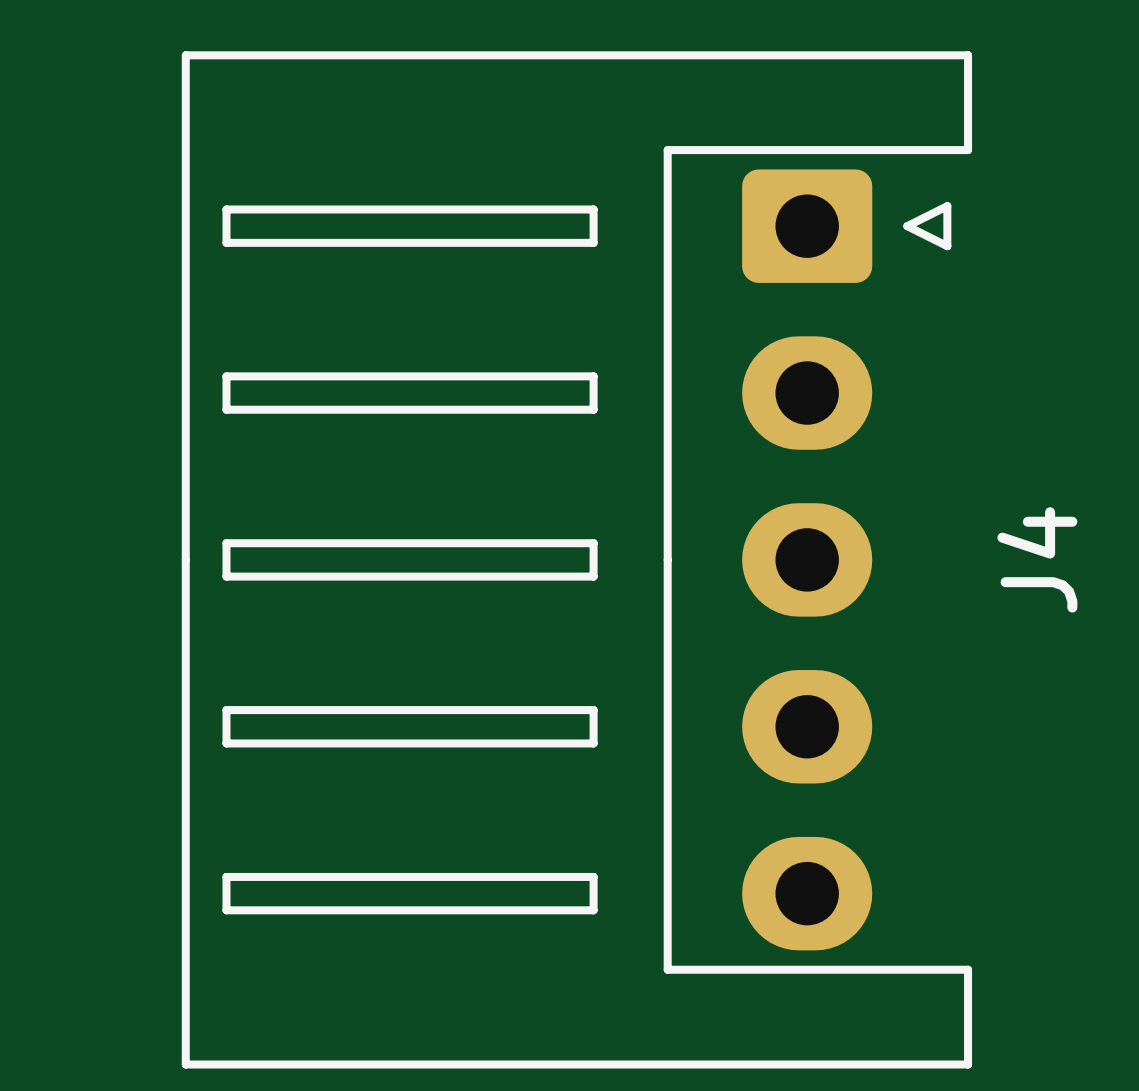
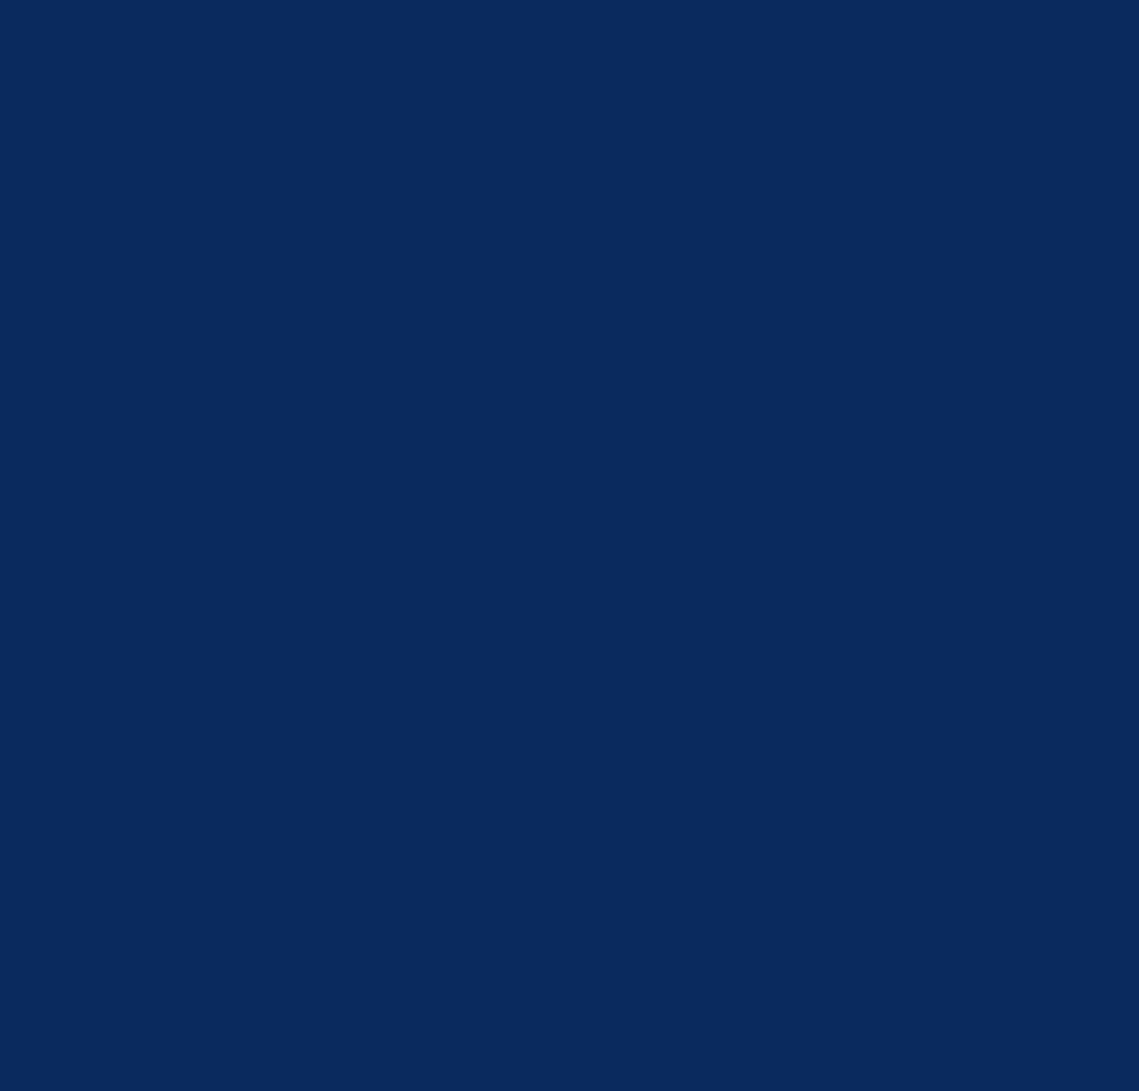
J4: (576, 559) -> none

